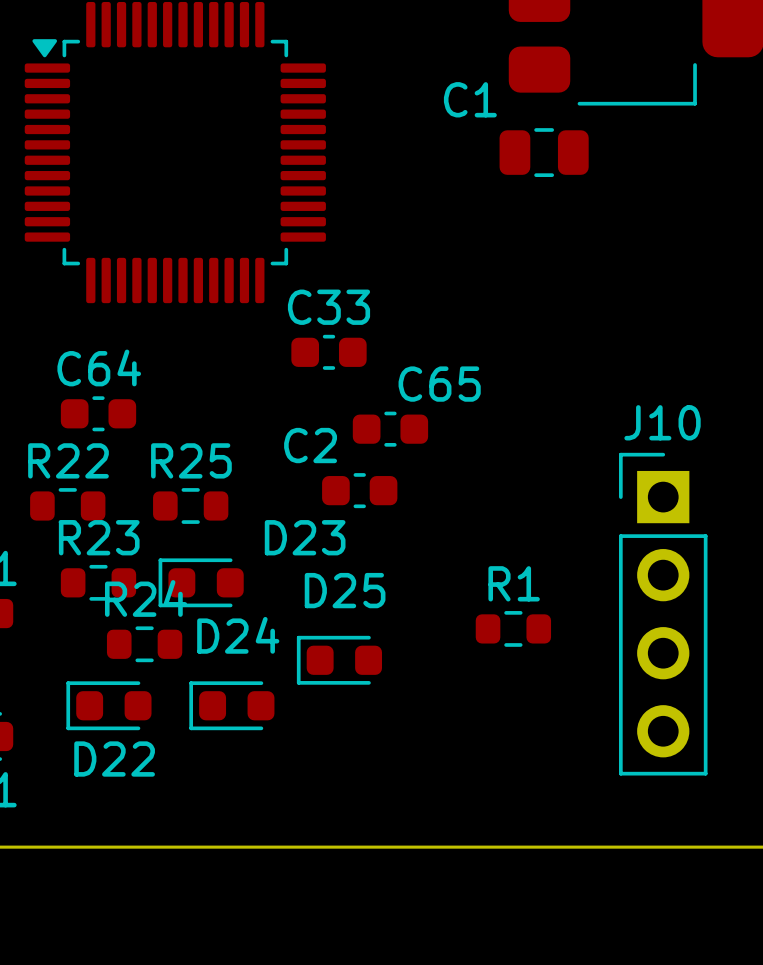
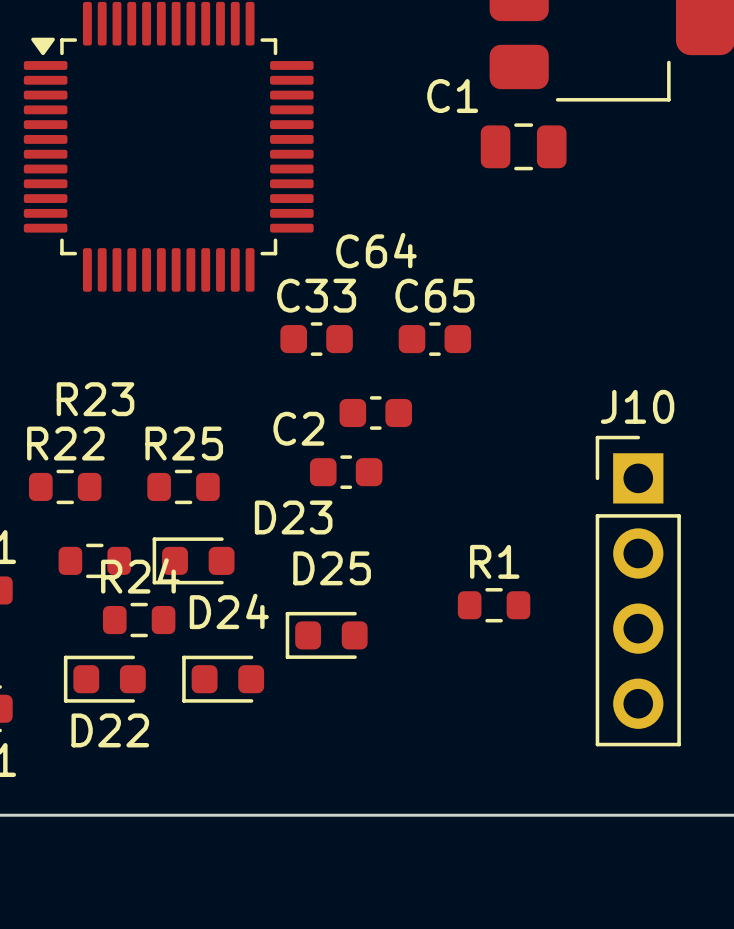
C65: none -> (434, 339)
C65 name: C65 (439, 384) -> C64 (376, 250)
C64: (98, 413) -> none
R23 name position: R23 (99, 537) -> R23 (95, 399)

